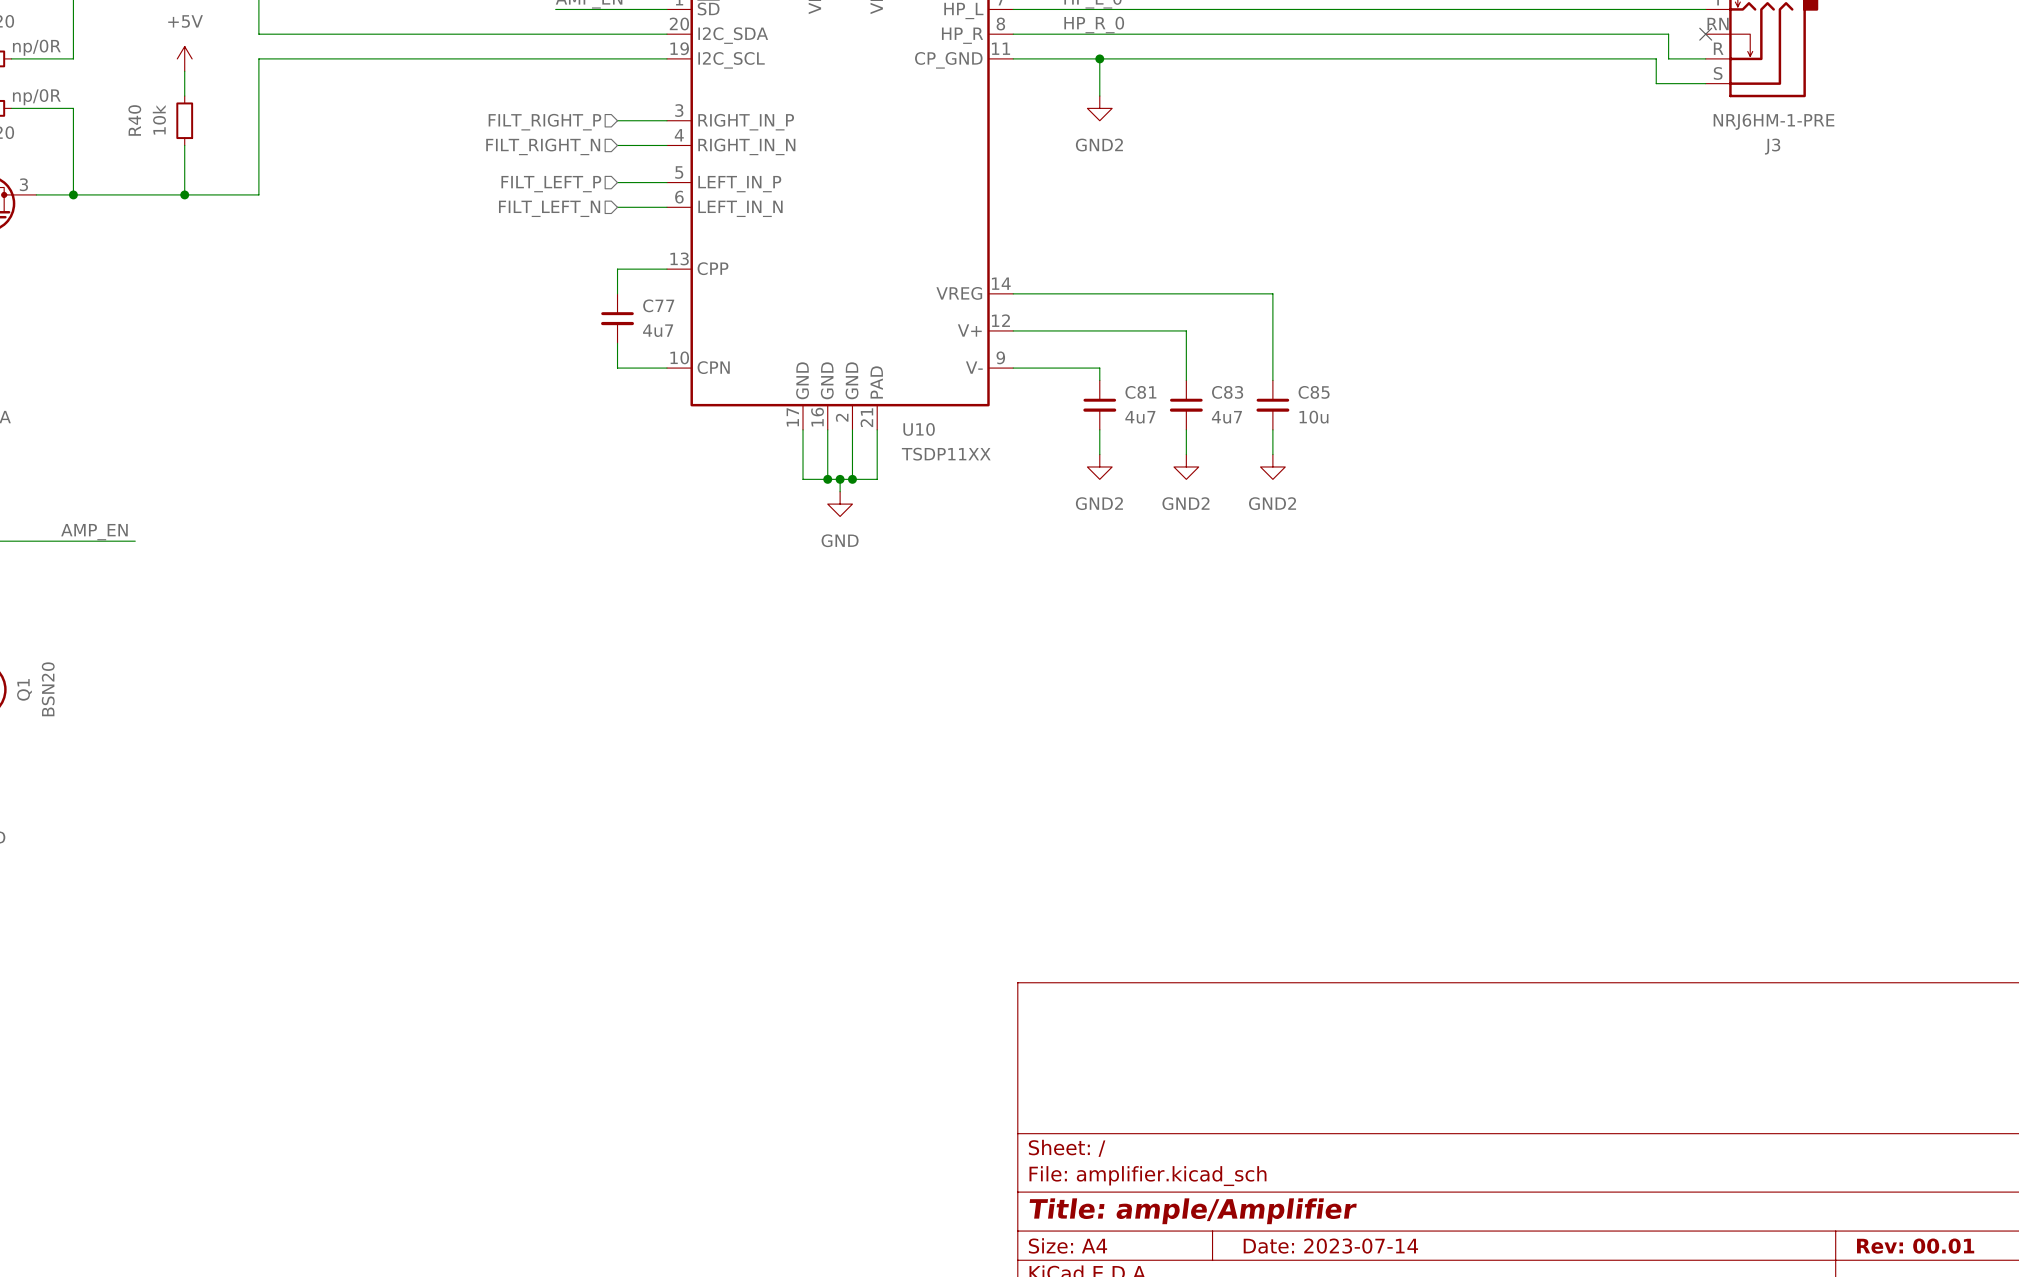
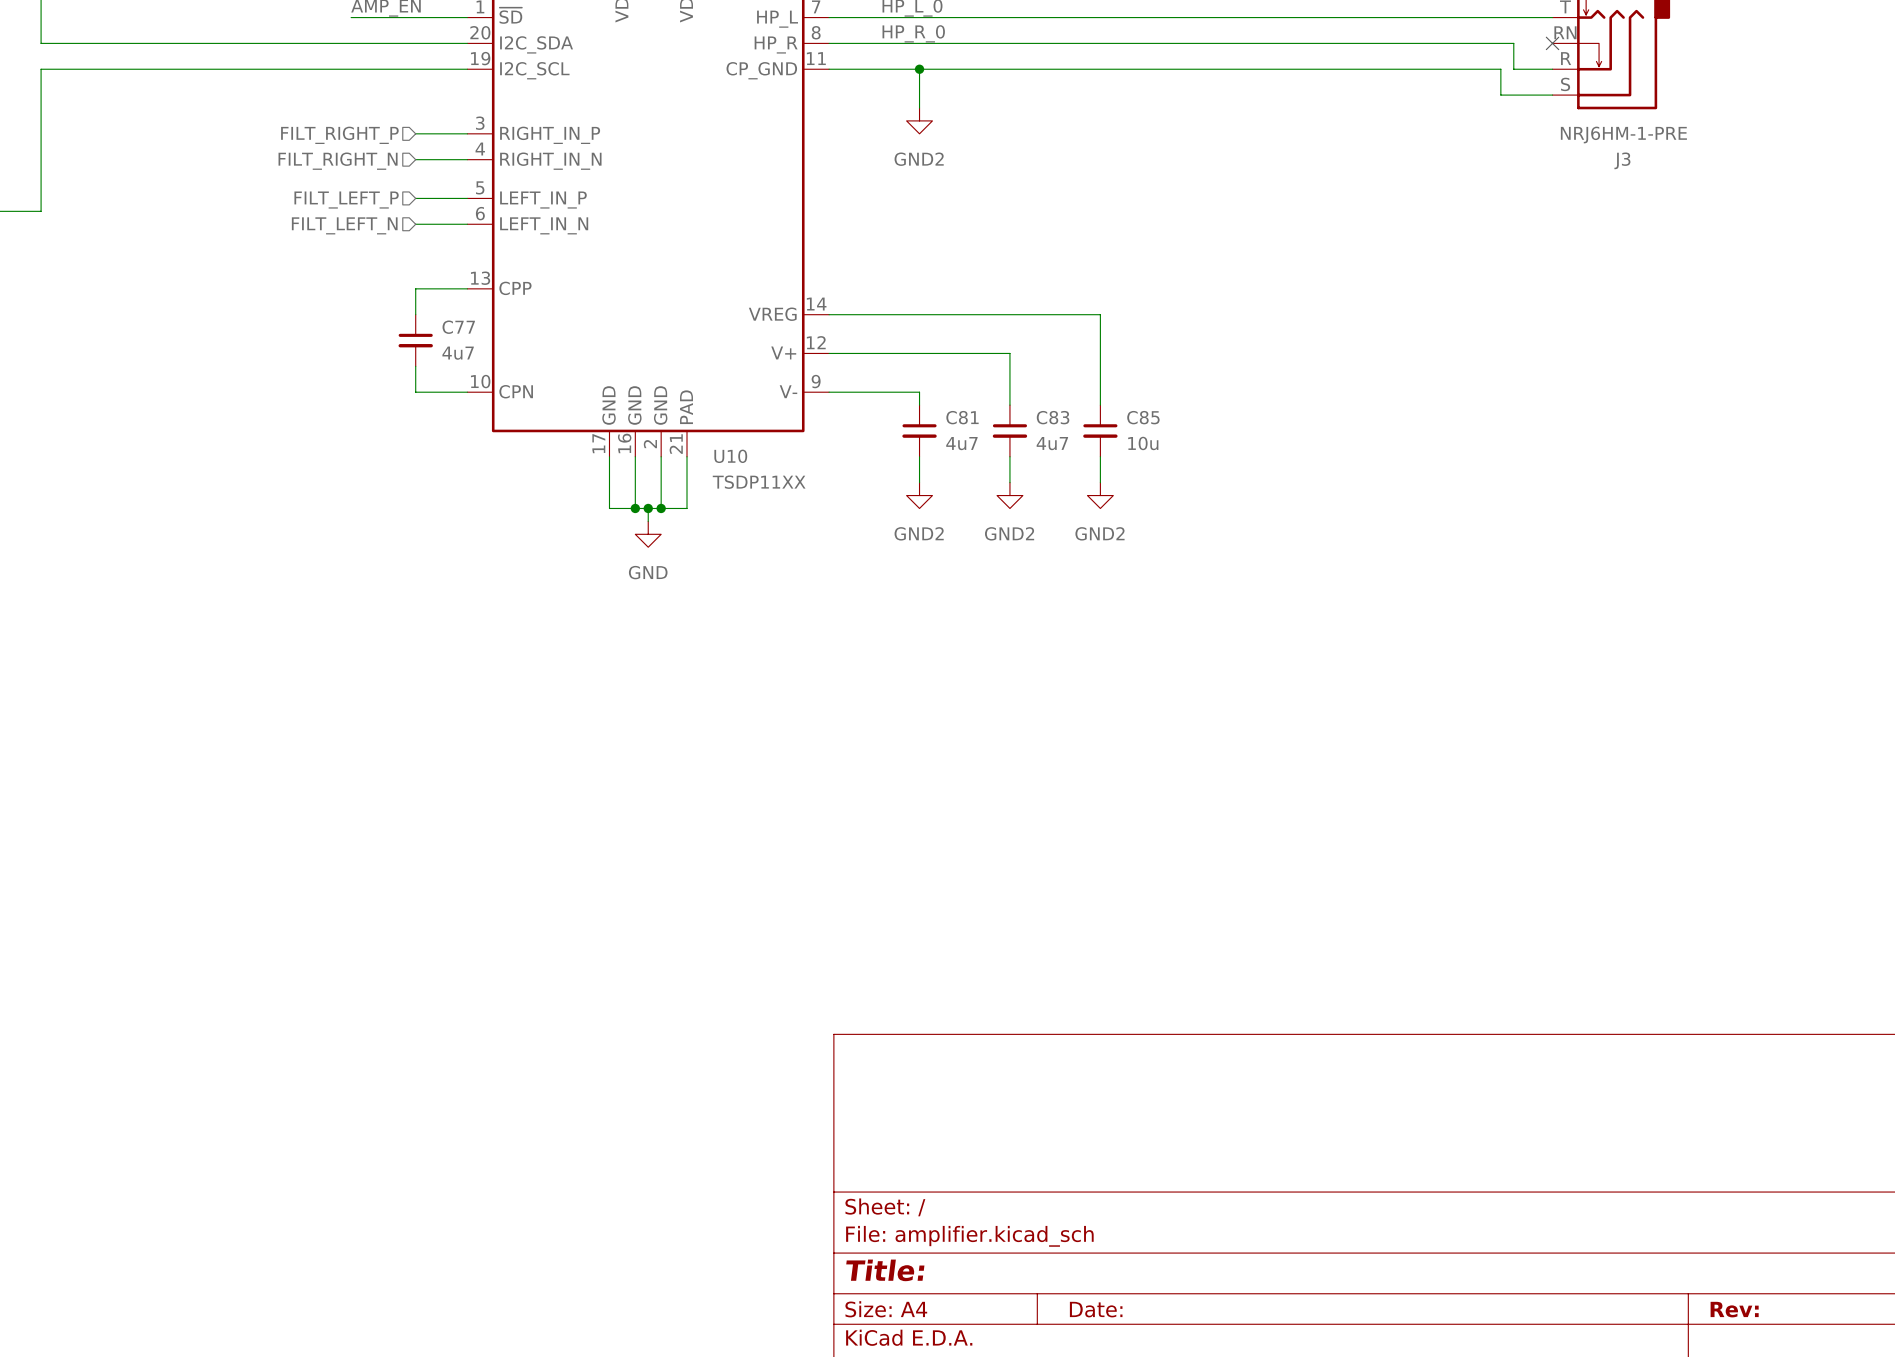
title block: Title: ample/Amplifier (1193, 1211) -> Title: (885, 1270)
title block: Date: 2023-07-14 (1330, 1246) -> Date: (1096, 1309)
title block: Rev: 00.01 (1915, 1246) -> Rev: (1734, 1309)

